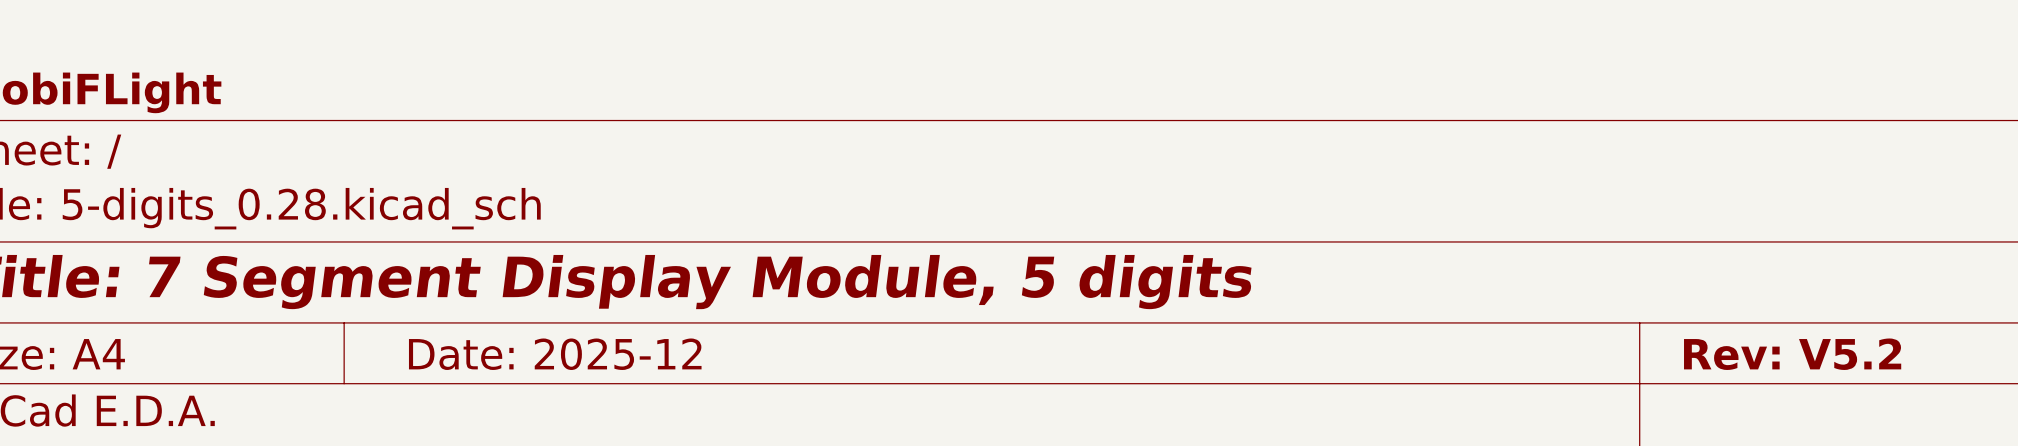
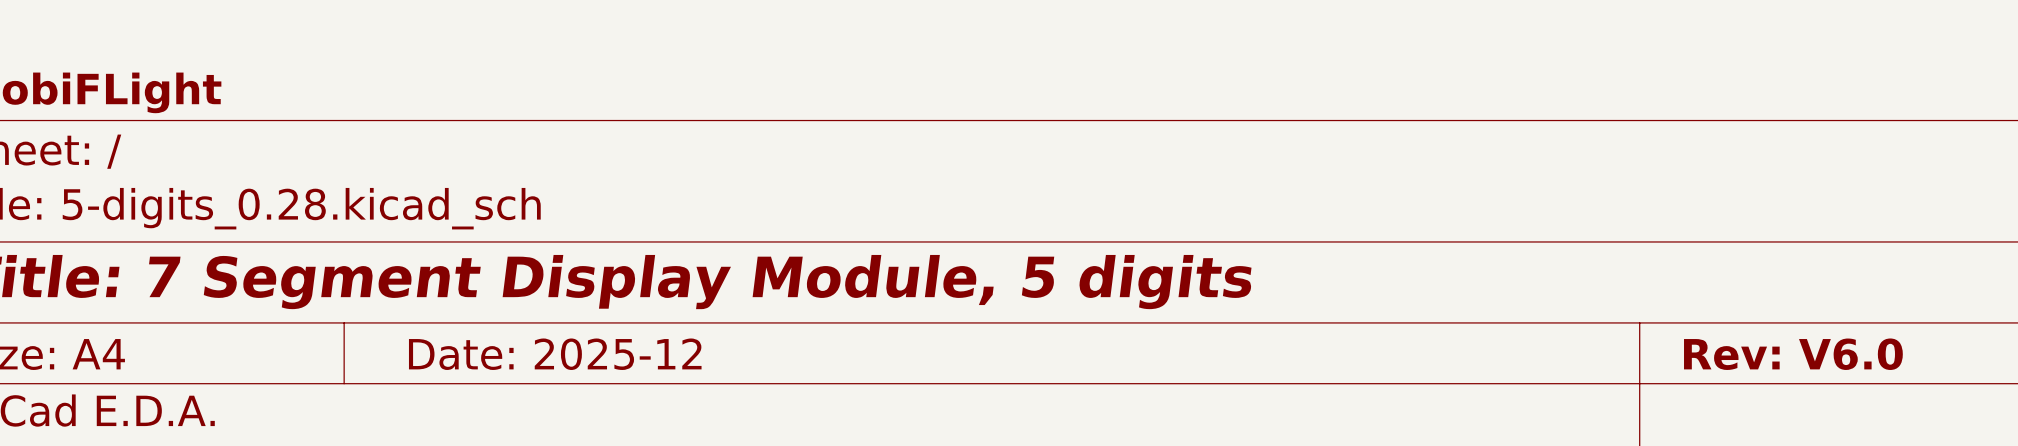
title block: Rev: V5.2 (1792, 354) -> Rev: V6.0 (1793, 354)

